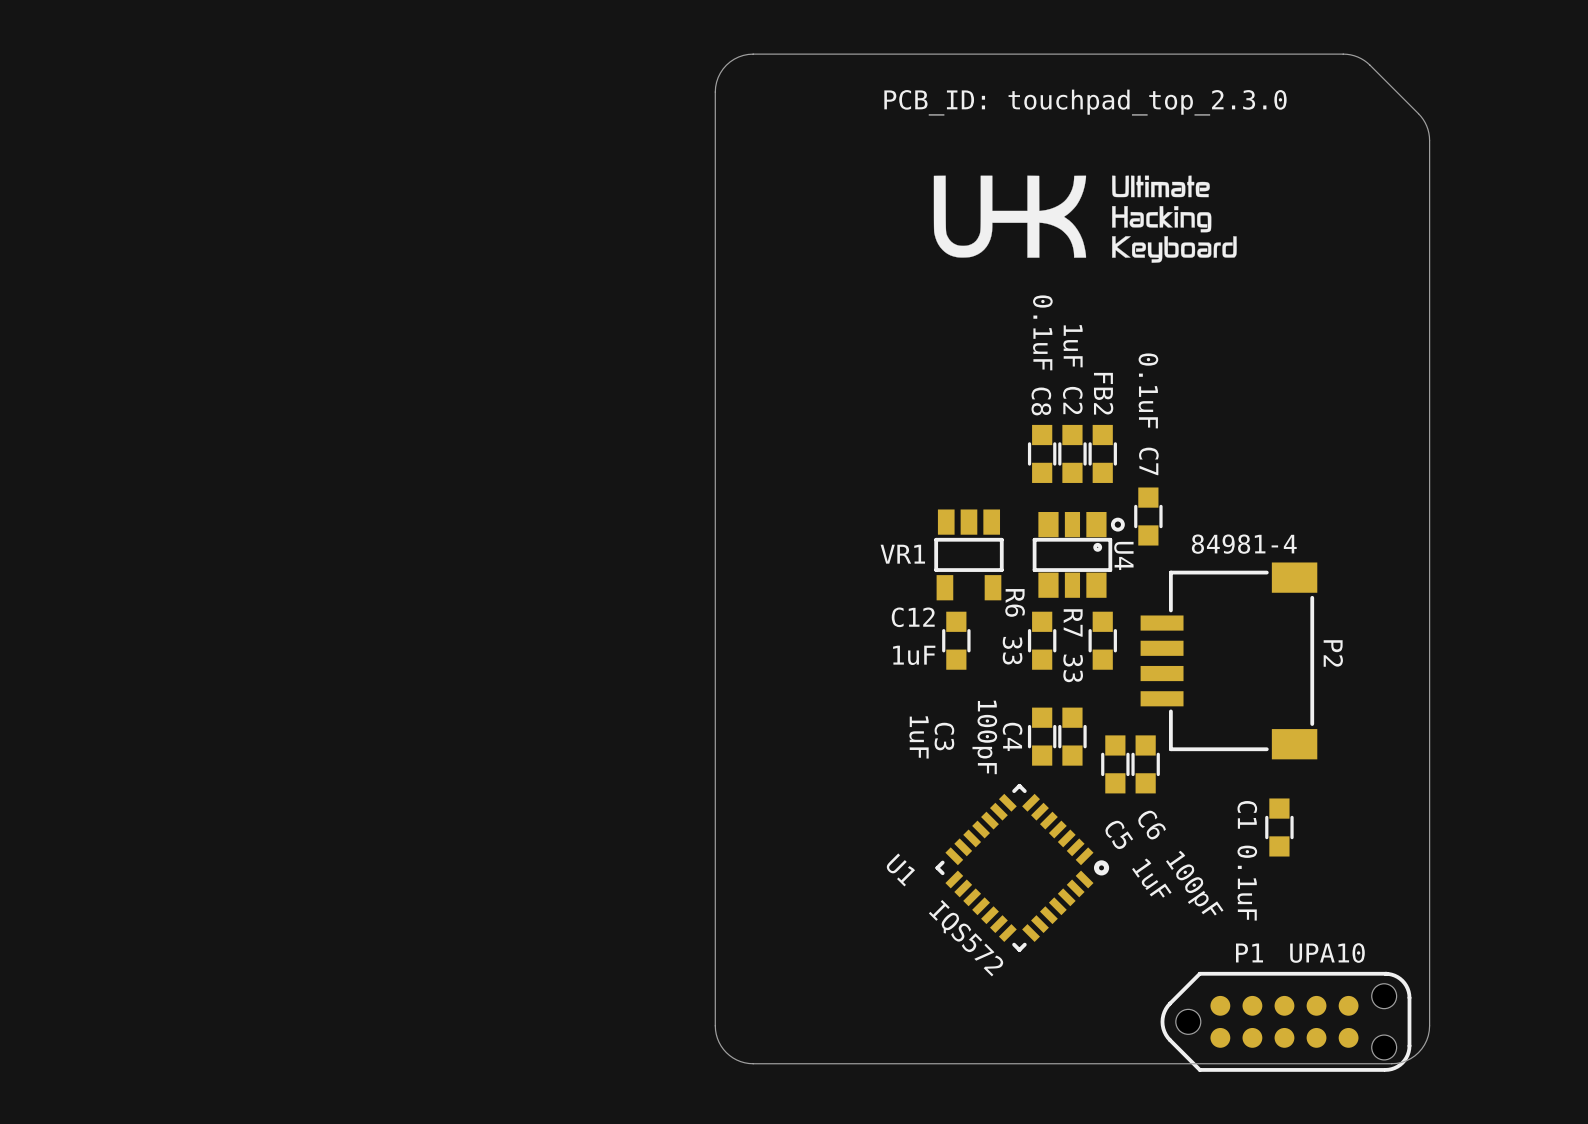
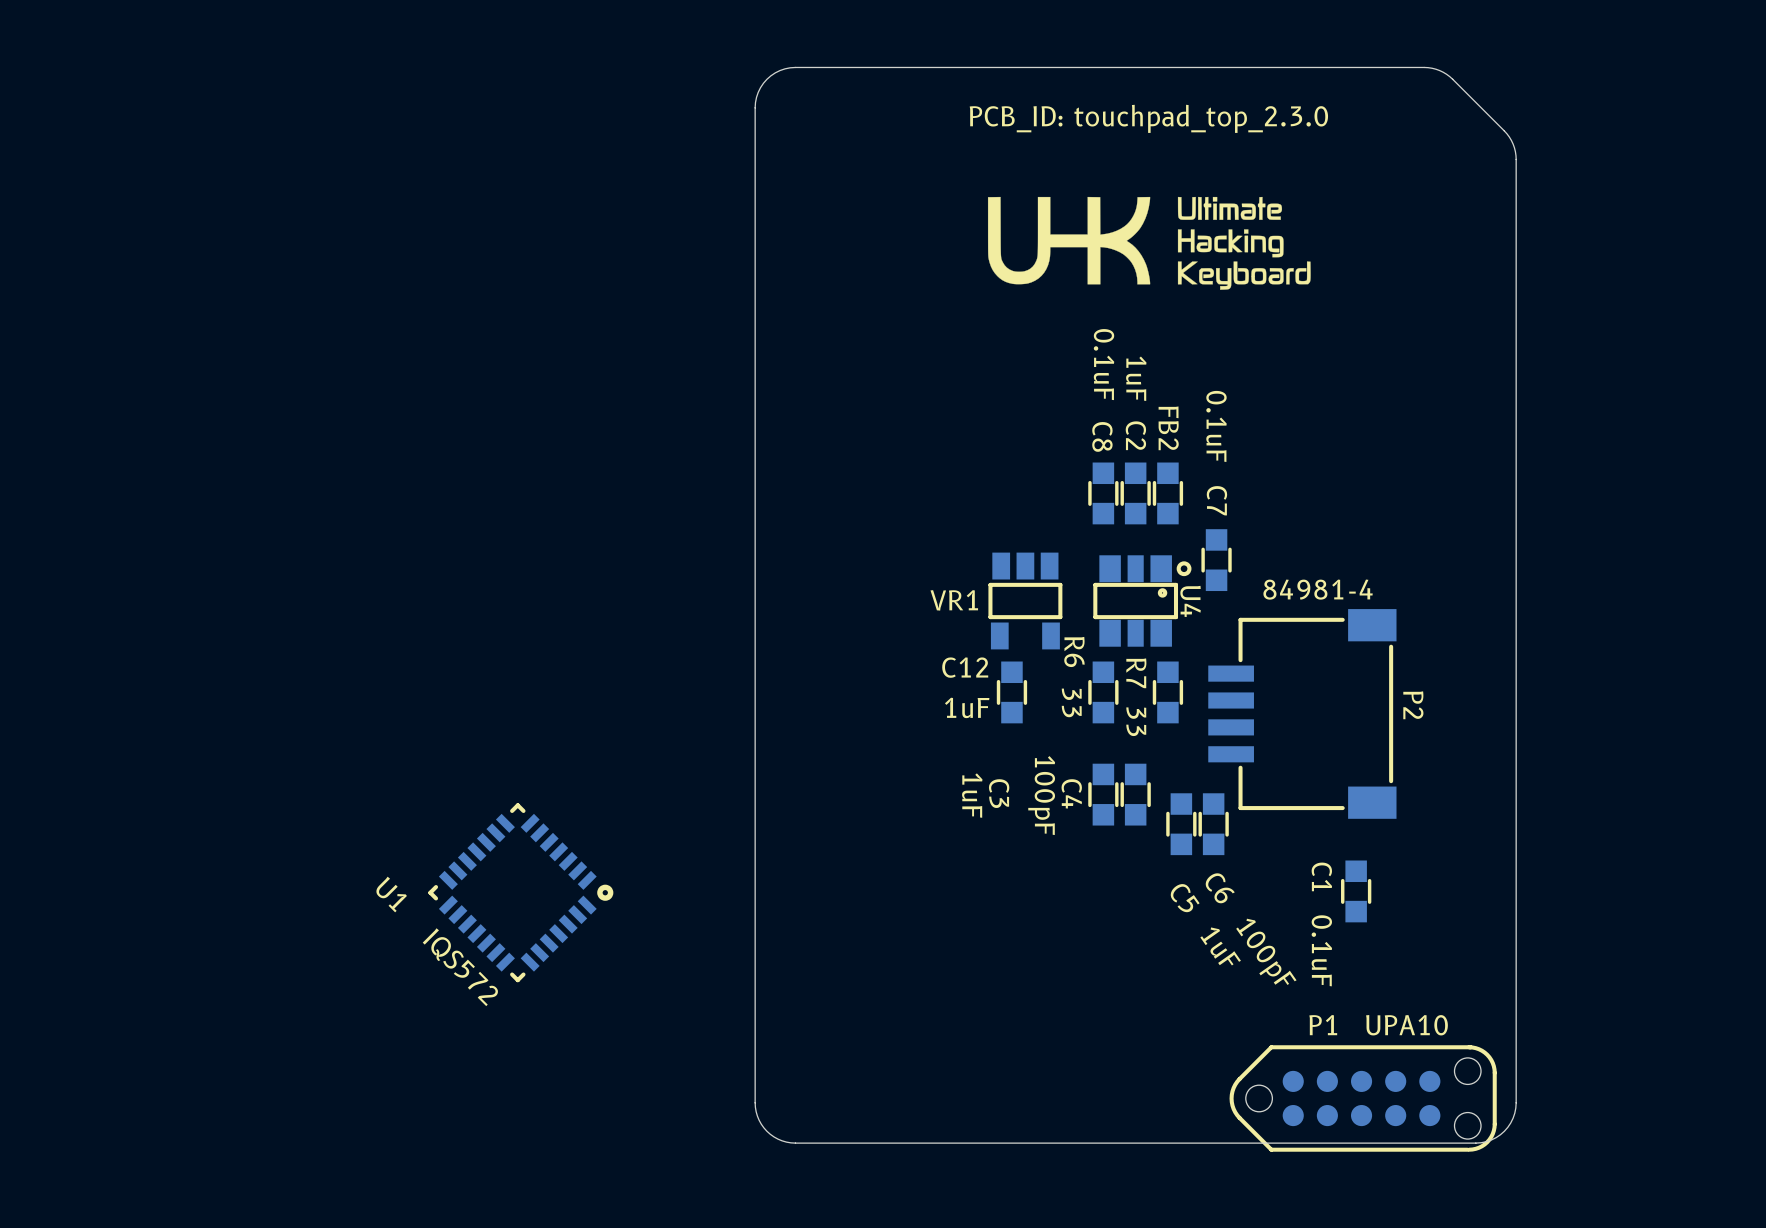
U1 position: (1022, 867) -> (520, 892)

